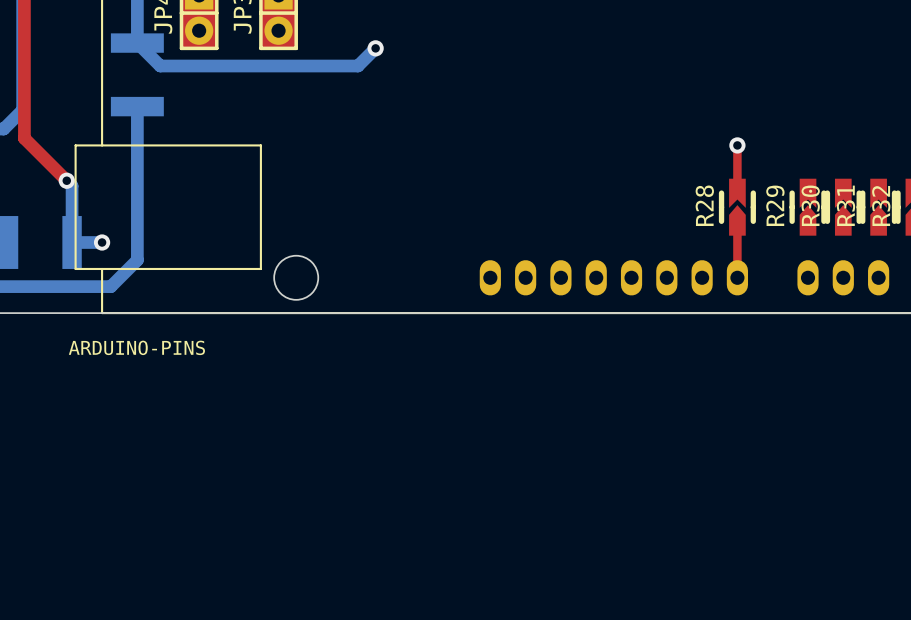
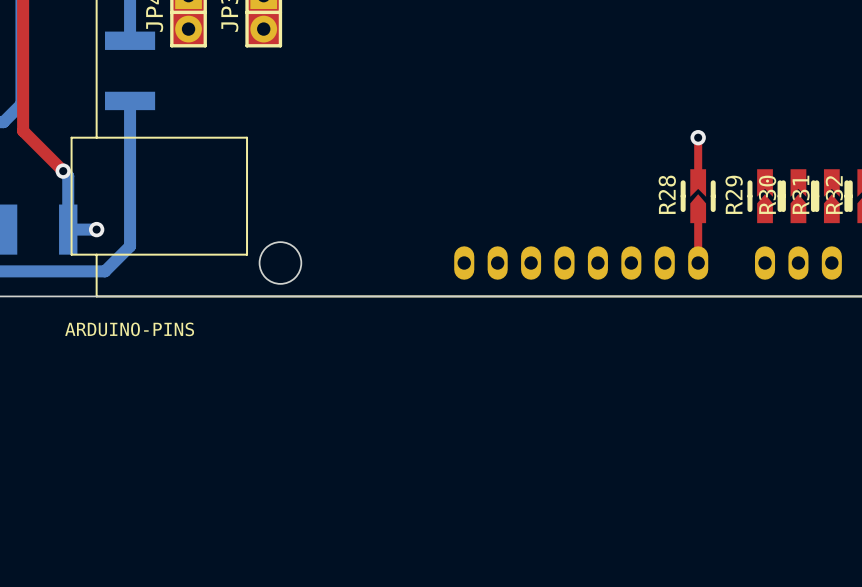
bottom track: (137, 43) (160, 66) (357, 66) (375, 48) -> none
via: (375, 48) -> none

